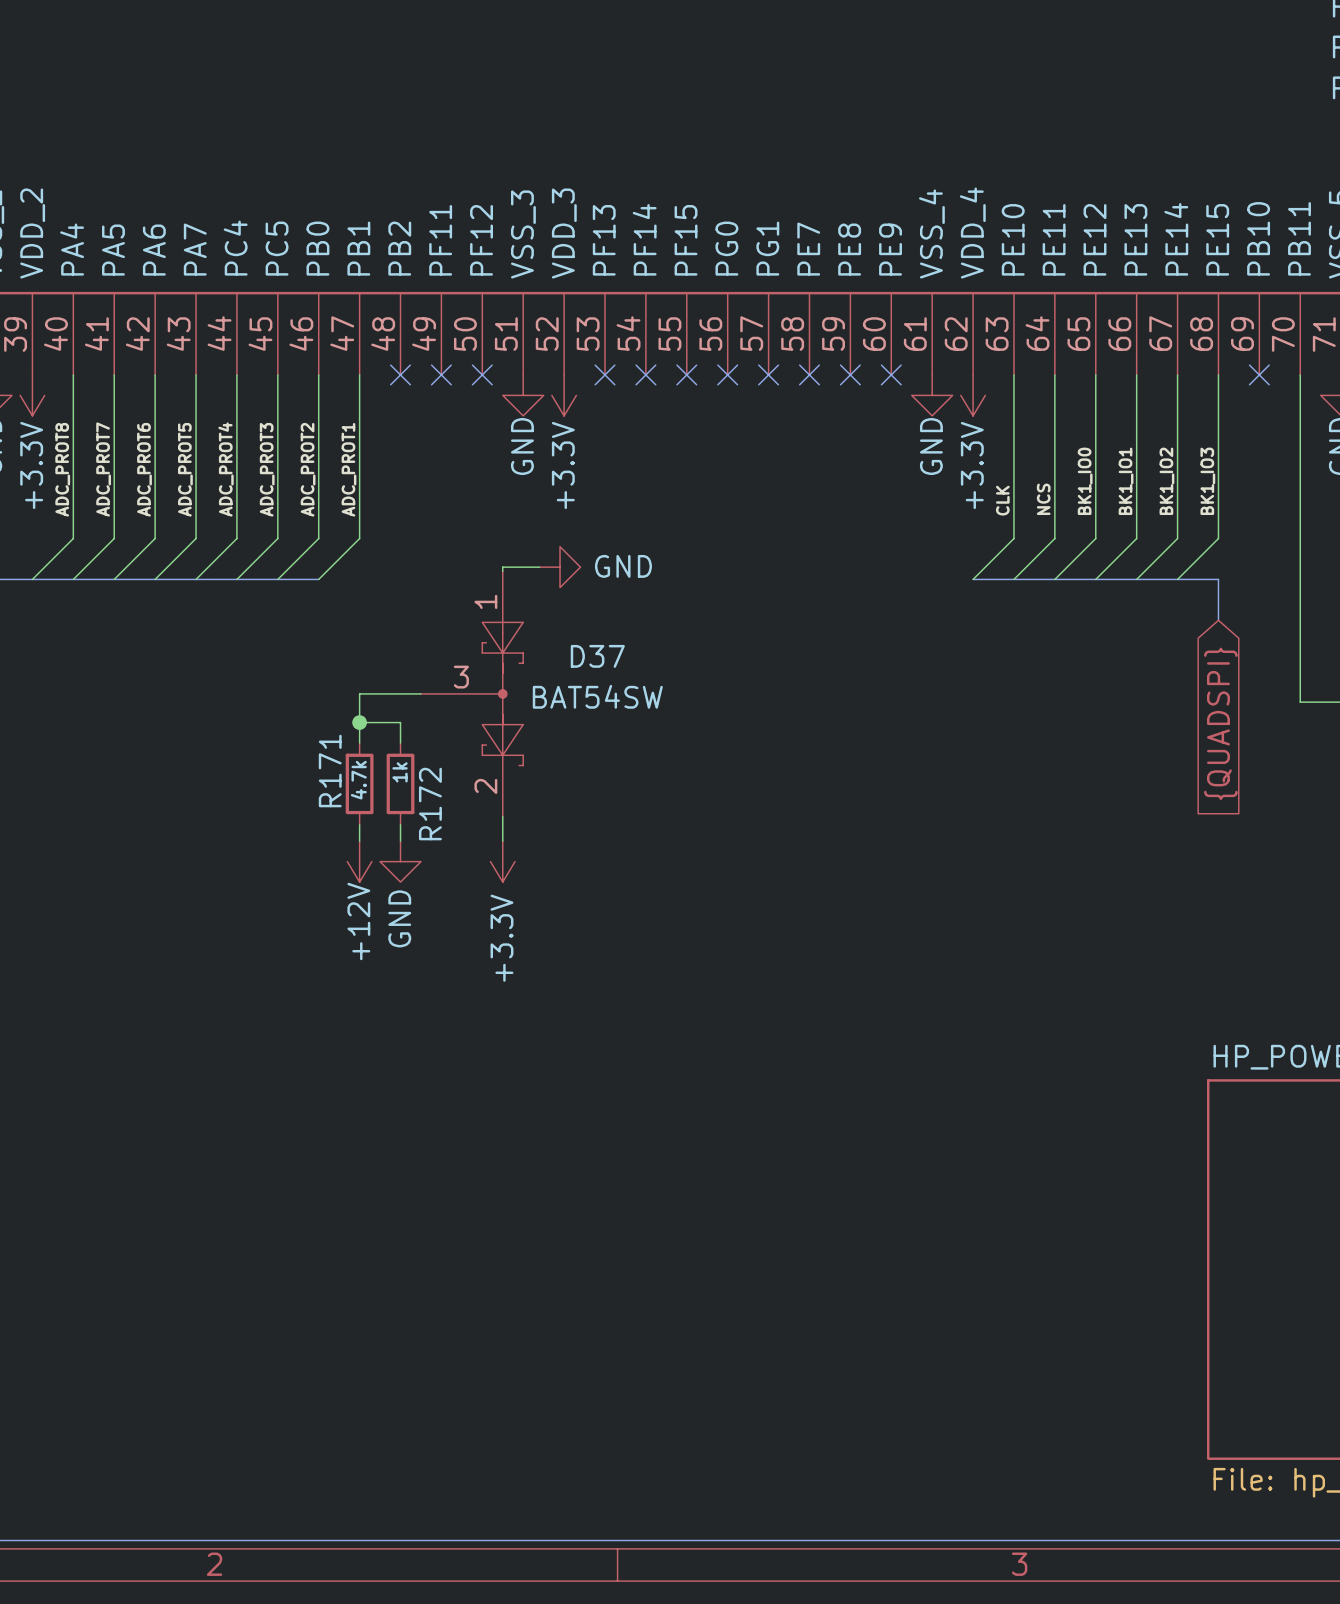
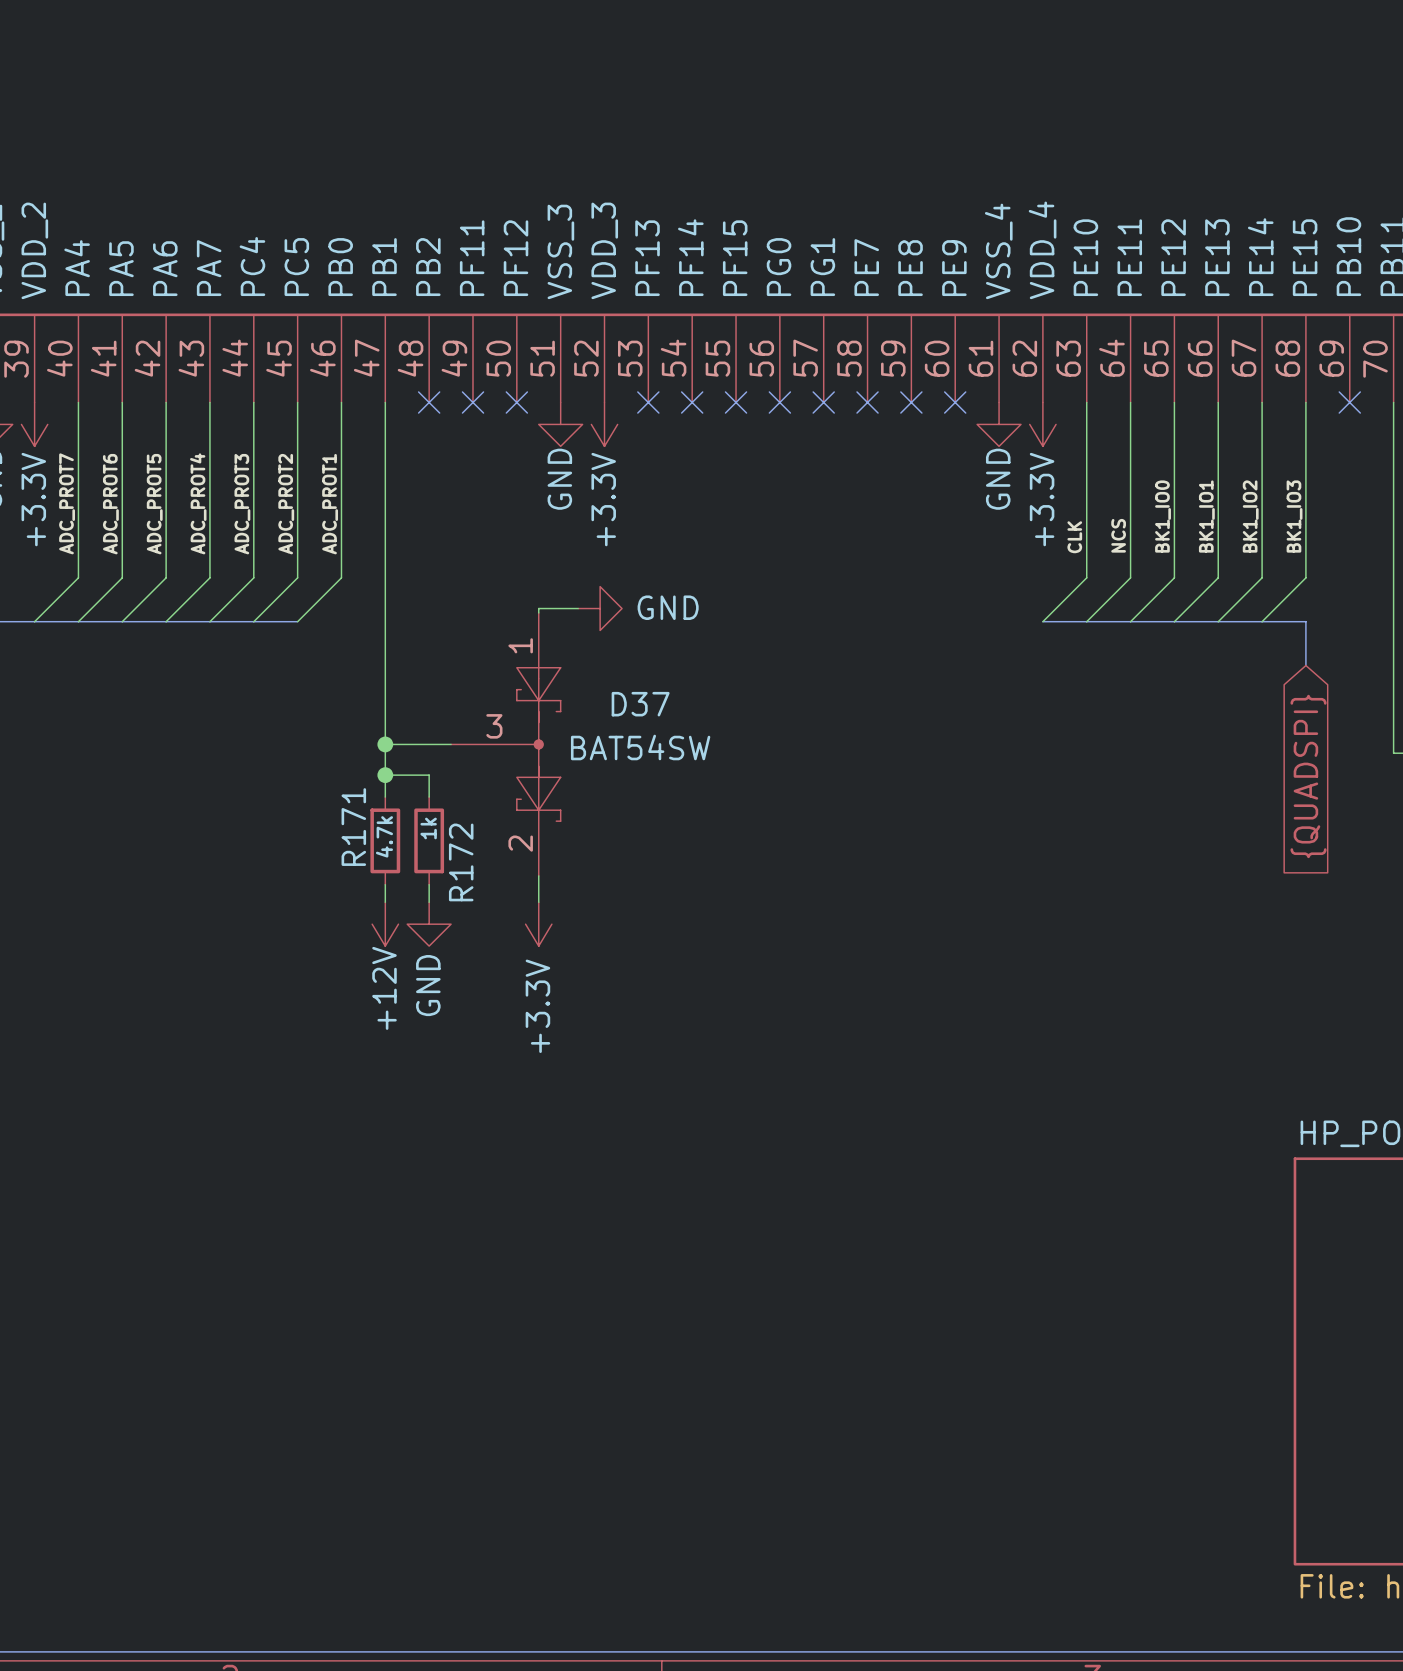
label: ADC_PROT8 (62, 469) -> ADC_PROT7 (67, 503)
label: ADC_PROT7 (103, 469) -> ADC_PROT6 (110, 504)
label: ADC_PROT6 (144, 469) -> ADC_PROT5 (154, 504)
label: ADC_PROT5 (185, 469) -> ADC_PROT4 (198, 503)
label: ADC_PROT4 (226, 469) -> ADC_PROT3 (242, 504)
label: ADC_PROT3 (267, 469) -> ADC_PROT2 (286, 504)
label: ADC_PROT2 (308, 469) -> ADC_PROT1 (330, 504)
label: ADC_PROT1 (348, 469) -> none
wire: (359, 538) (318, 579) -> (385, 577) (385, 744)
bus: (277, 579) (318, 579) -> none
junction: none -> (385, 744)

